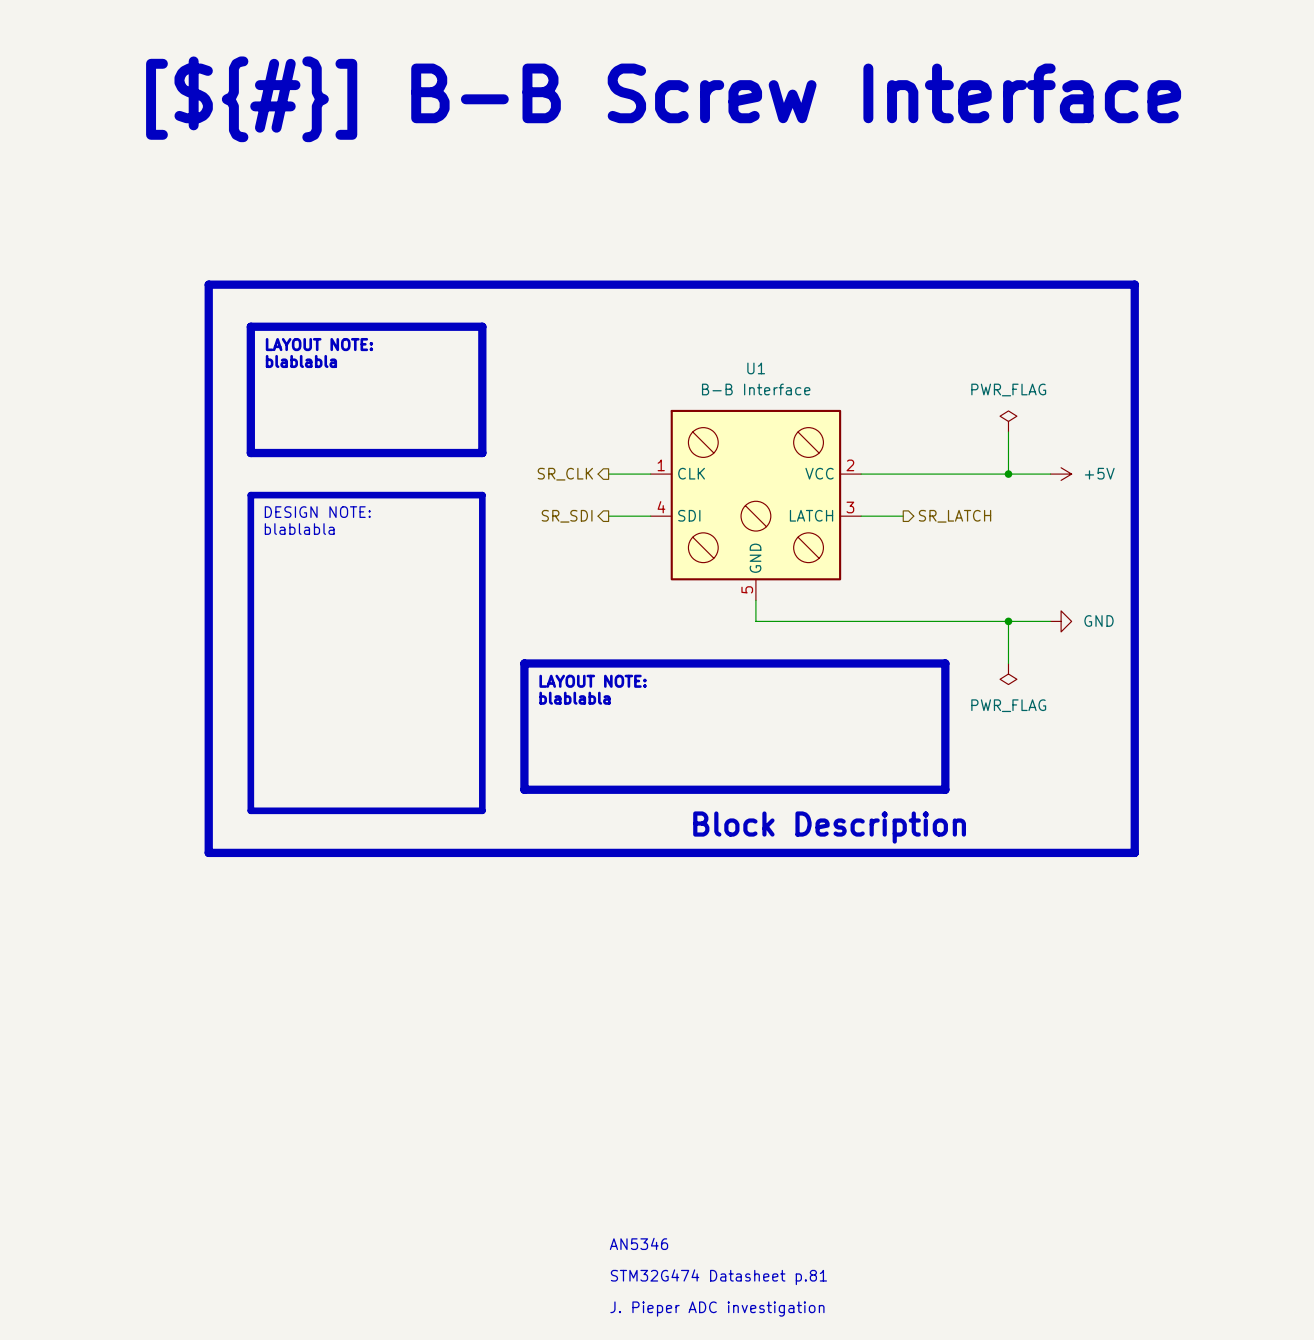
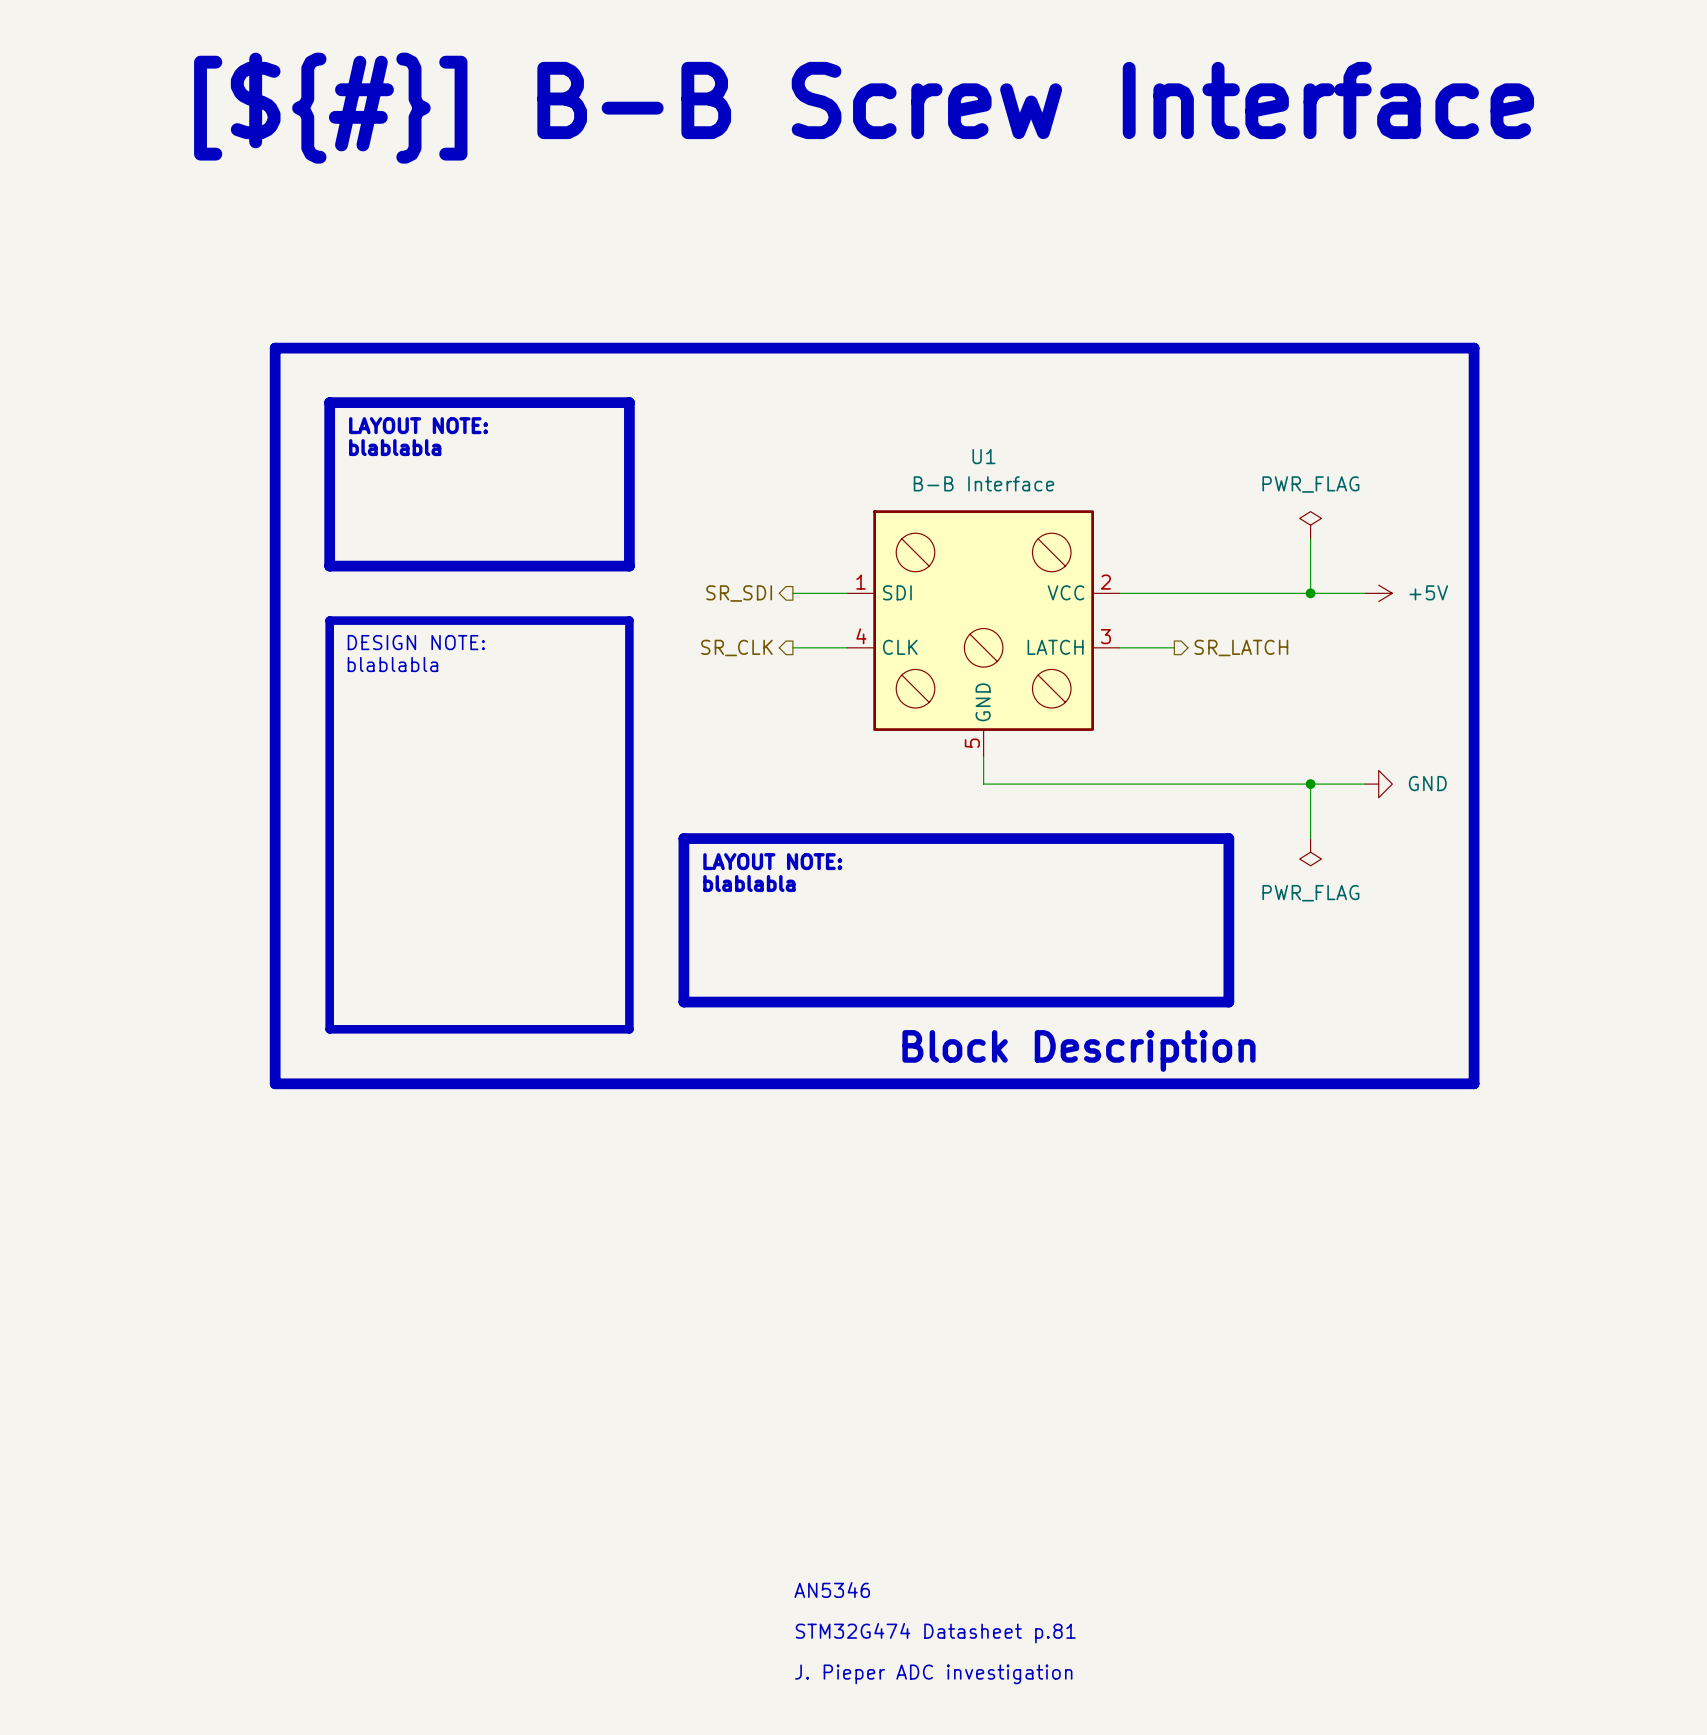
U1 pin name: CLK (691, 473) -> SDI (897, 592)
hierarchical label: SR_CLK (565, 474) -> SR_SDI (739, 593)
U1 pin name: SDI (689, 515) -> CLK (900, 647)
hierarchical label: SR_SDI (567, 516) -> SR_CLK (736, 647)

